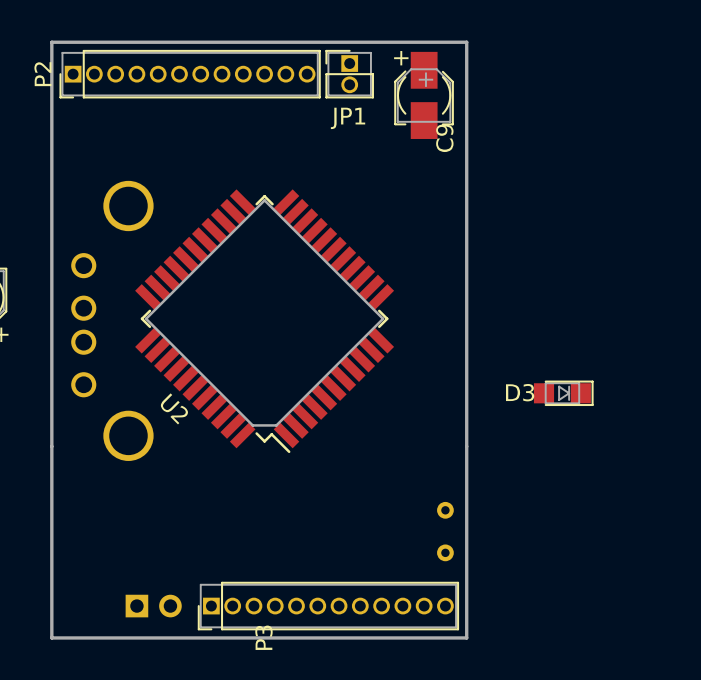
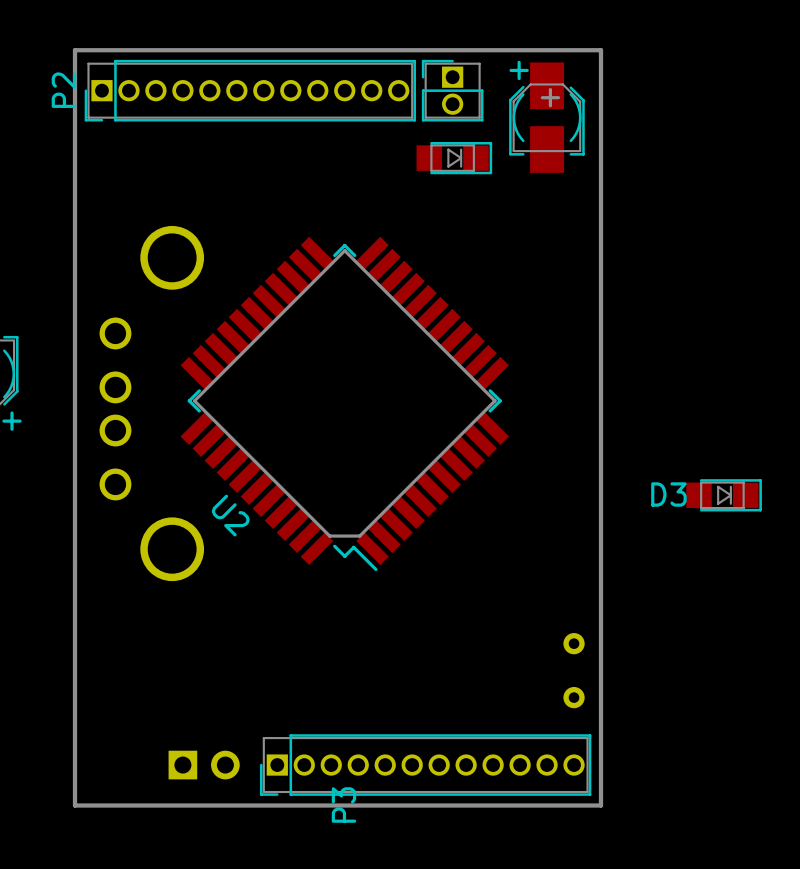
JP1 name: JP1 (348, 118) -> none
part: none -> (454, 158)
C9 name: C9 (444, 138) -> none

